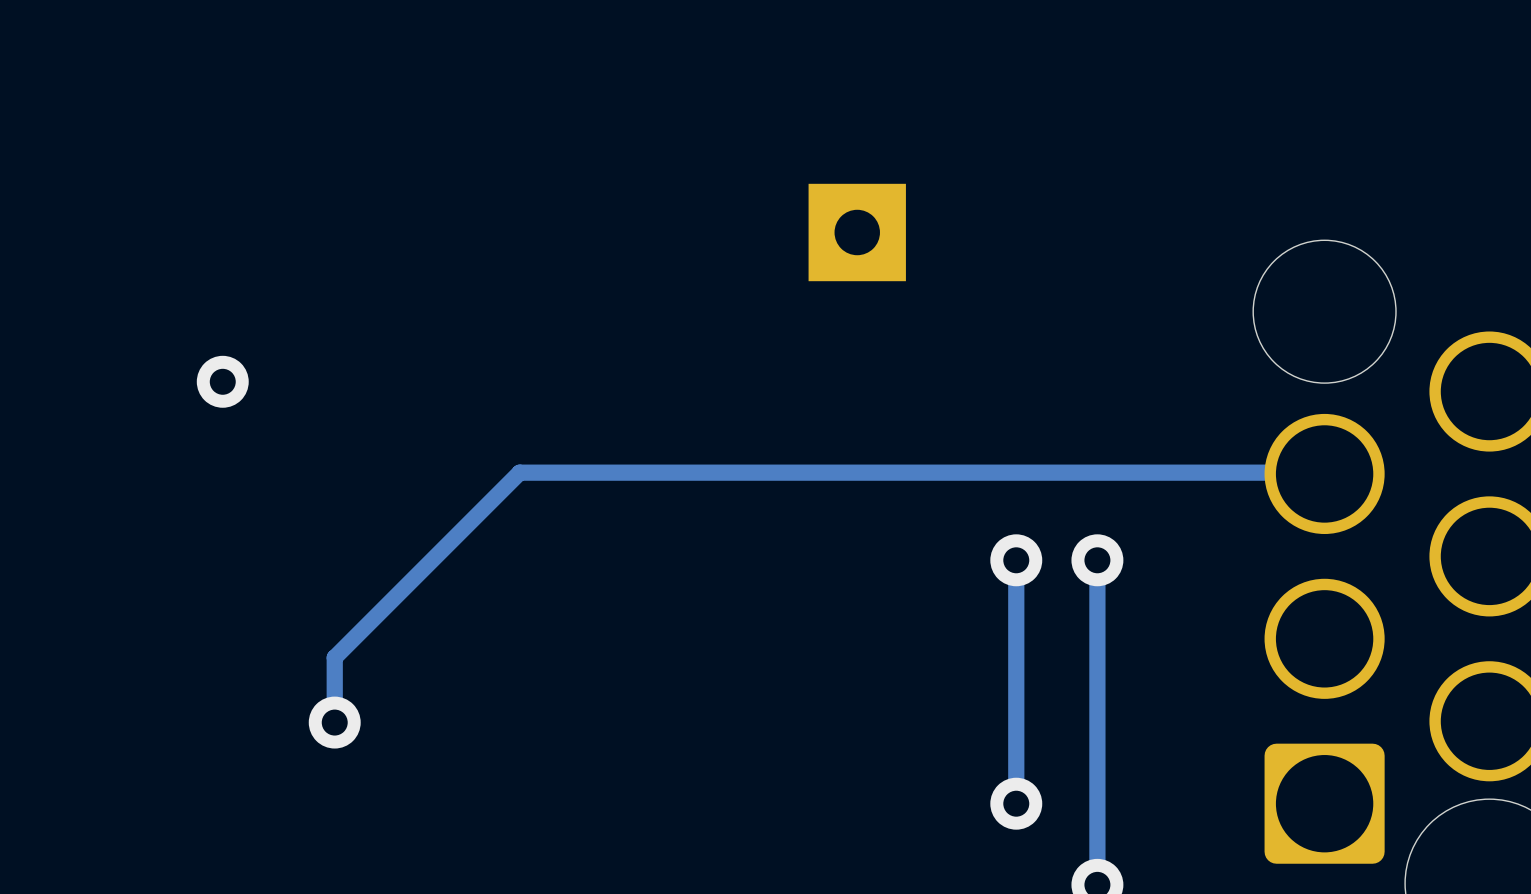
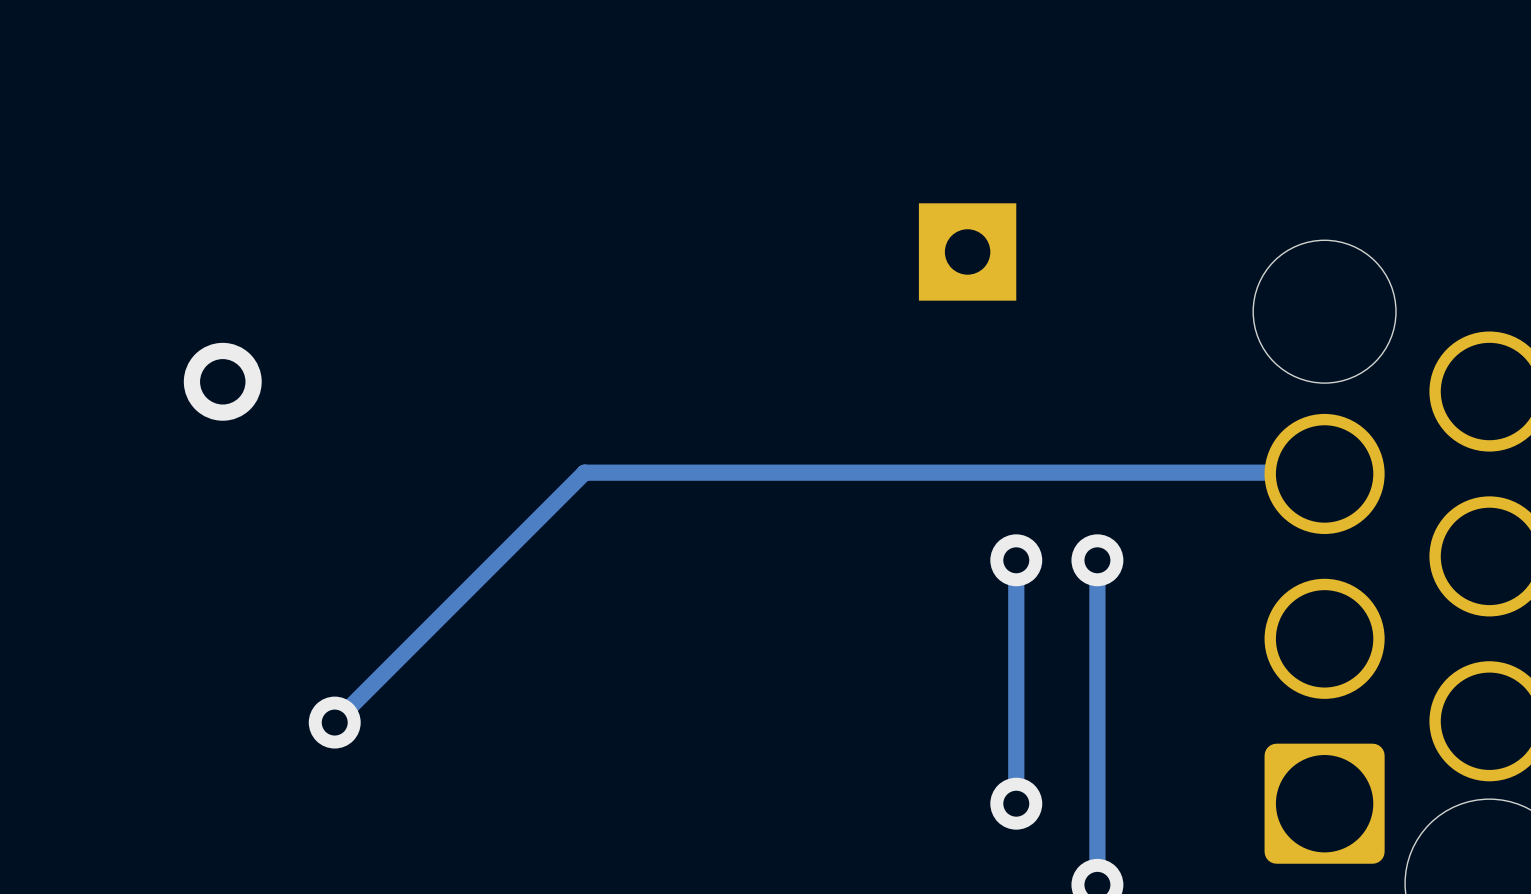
part position: (857, 232) -> (967, 251)
via size: [196, 355, 249, 408] -> [183, 342, 262, 421]
track: (584, 472) (519, 472) (334, 657) (334, 722) -> (584, 472) (334, 722)

